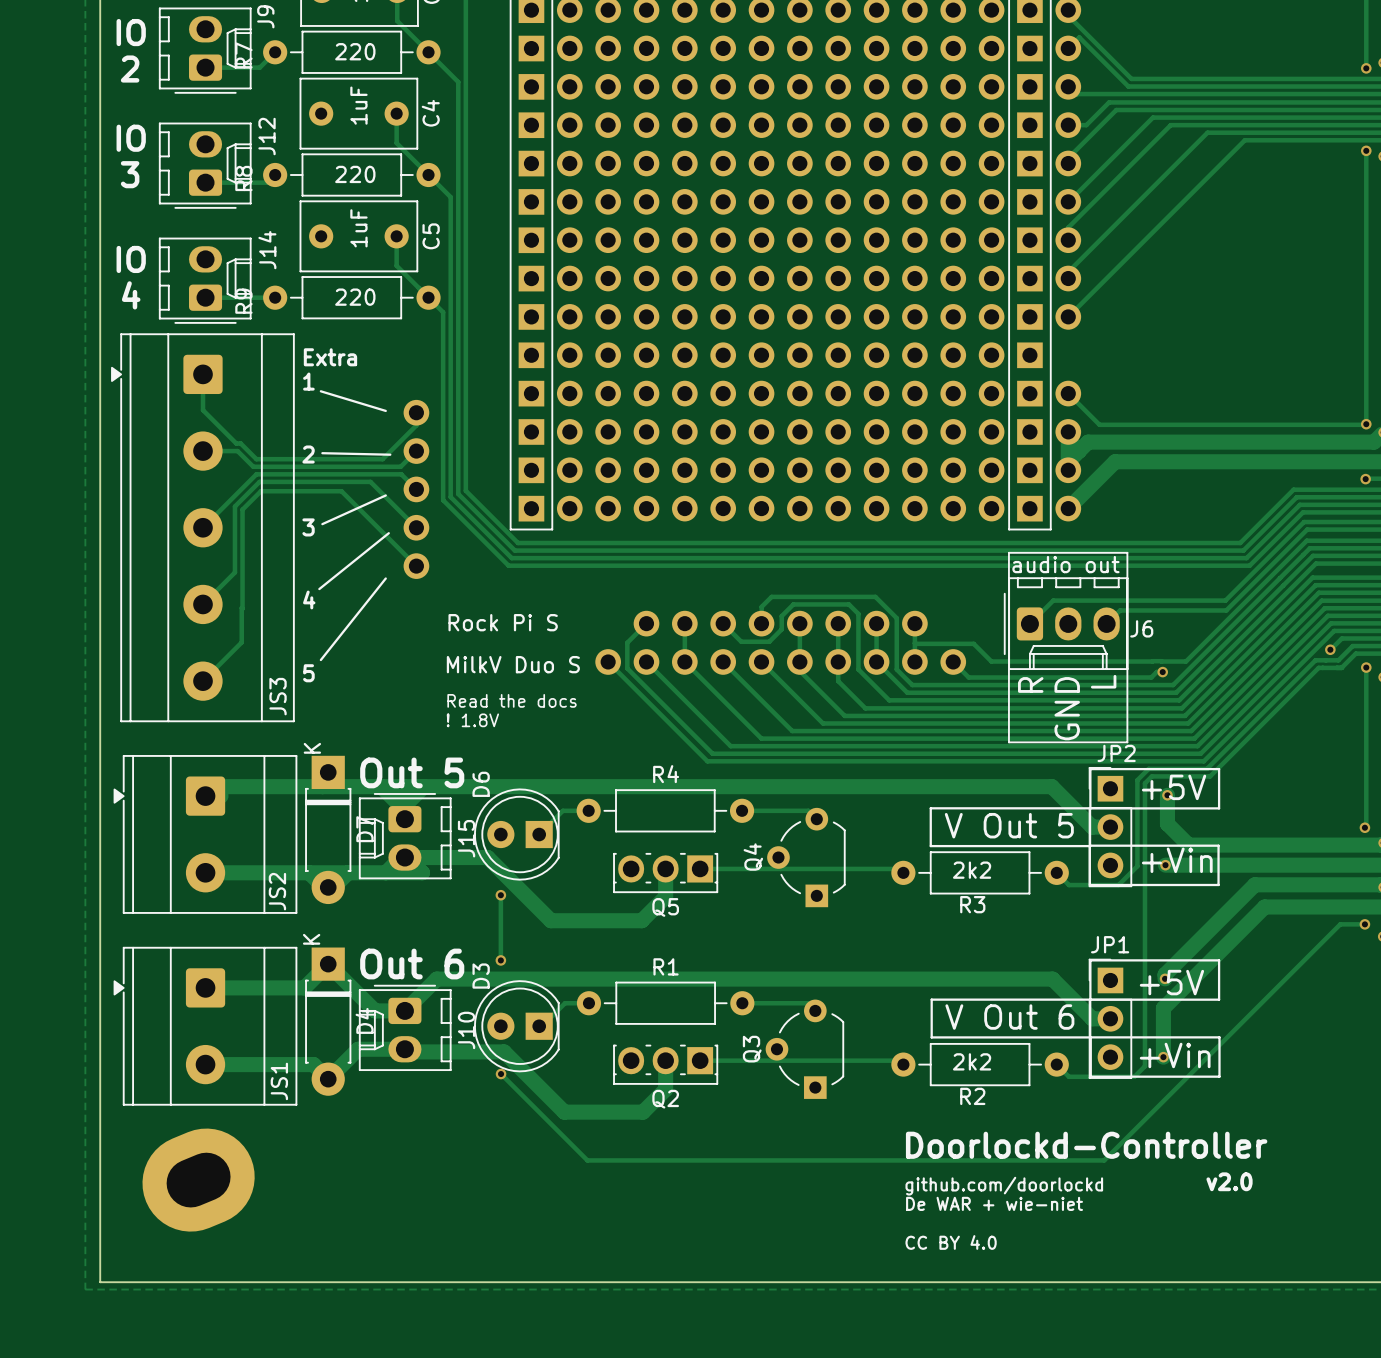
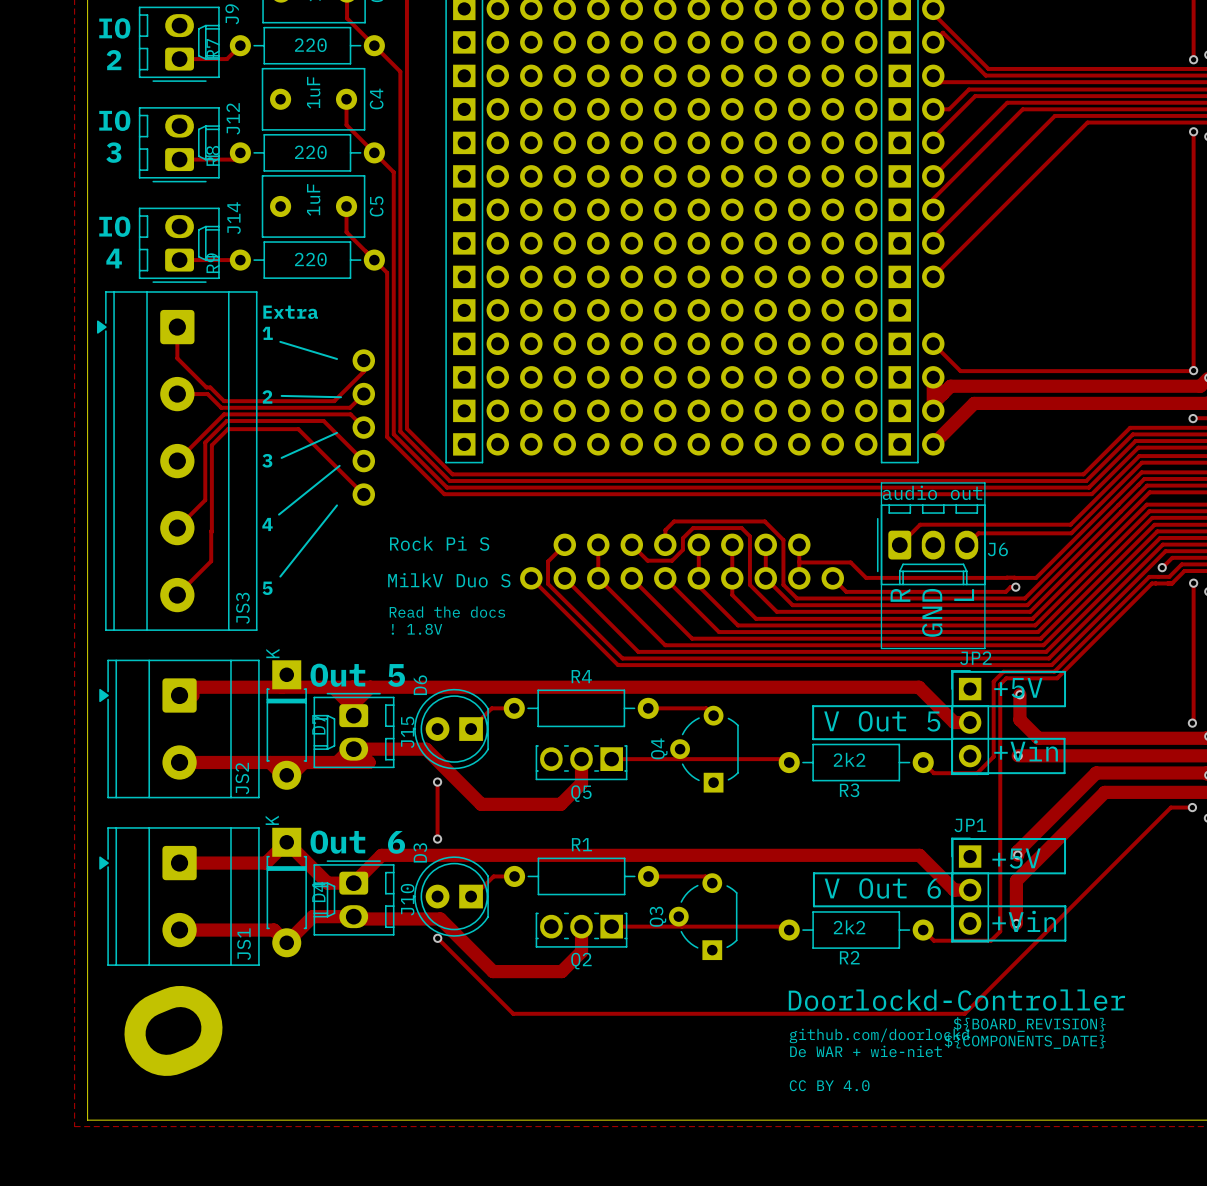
text: none -> ${BOARD_REVISION} (1029, 1024)
text: v2.0 (1229, 1181) -> none
text: none -> ${COMPONENTS_DATE} (1025, 1041)

